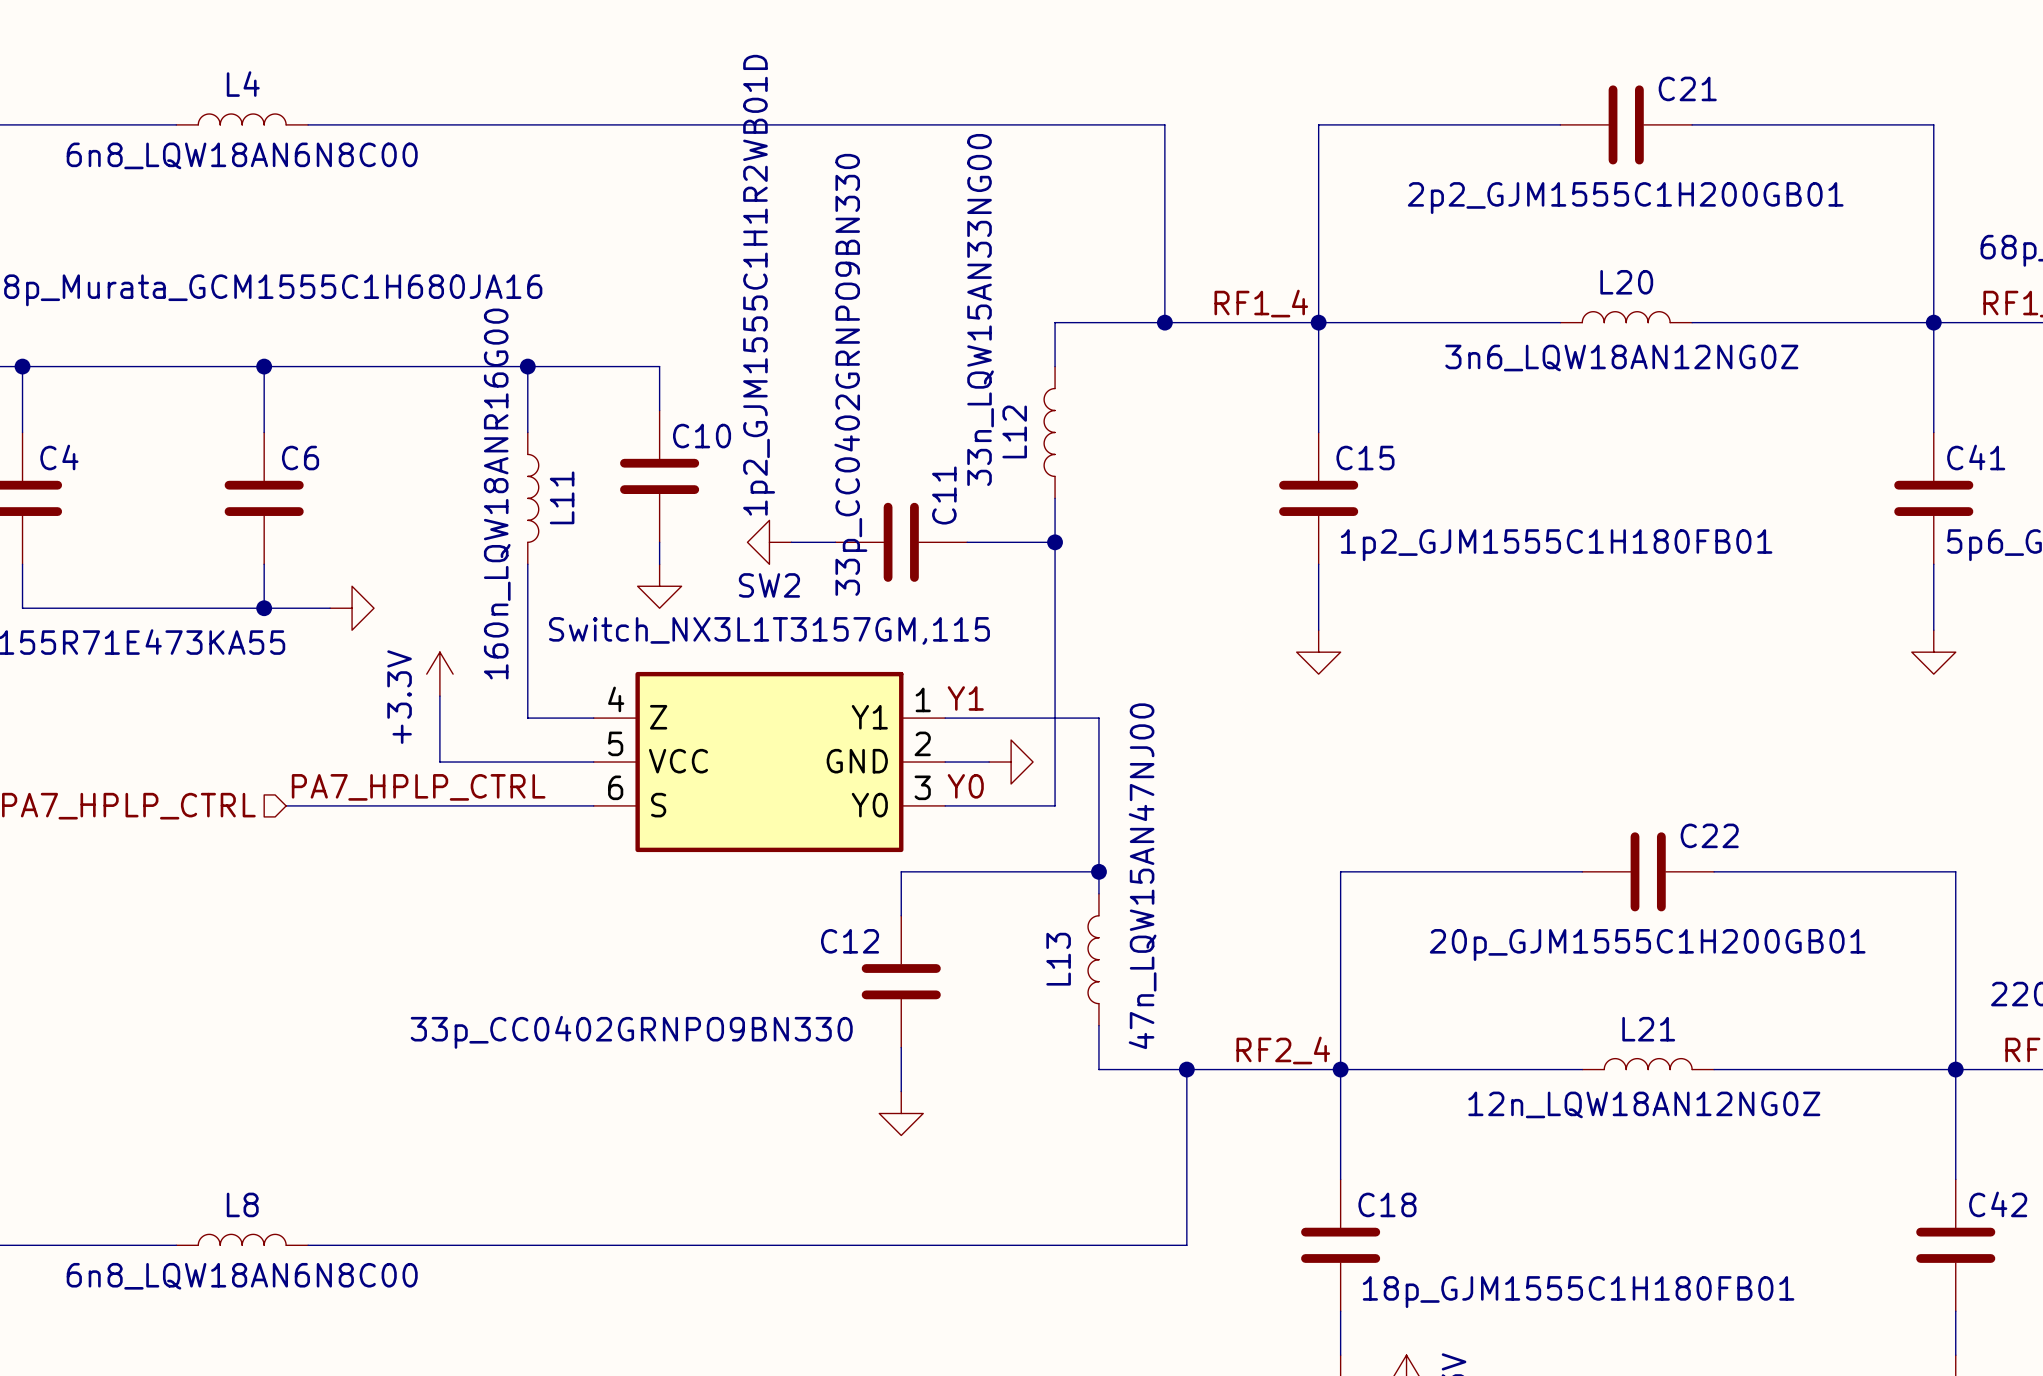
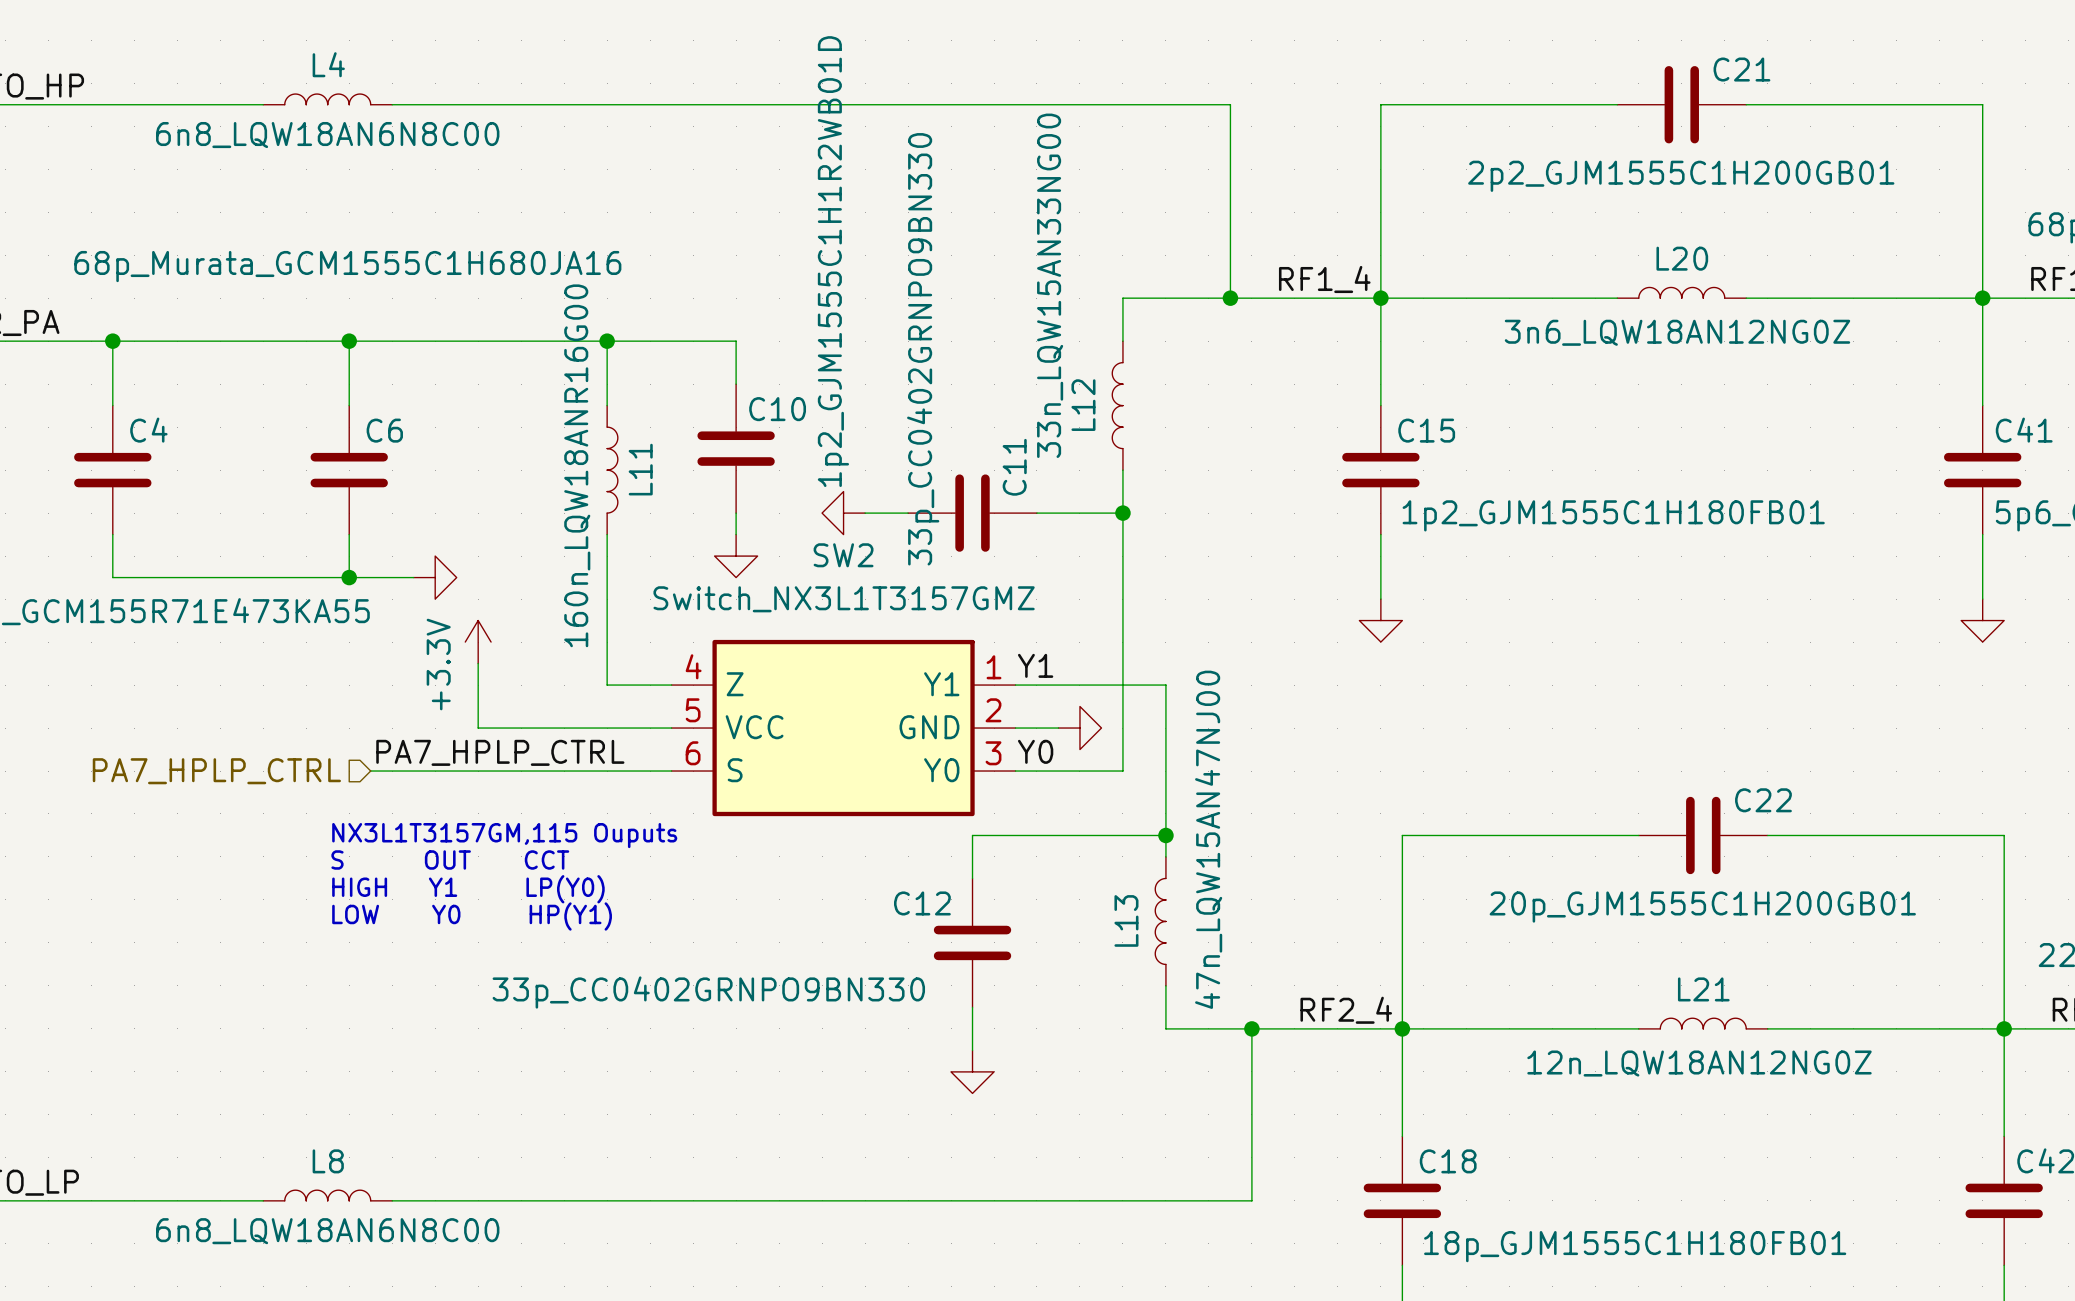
SW2 value: Switch_NX3L1T3157GM,115 (769, 630) -> Switch_NX3L1T3157GMZ (844, 599)
power symbol position: +3.3V (439, 674) -> +3.3V (478, 642)
wire: (439, 696) (439, 762) -> (478, 663) (478, 728) (521, 728)
text: none -> NX3L1T3157GM,115 Ouputs (504, 835)
text: none -> S OUT CCT (450, 859)
text: none -> HIGH Y1 LP(Y0) (468, 889)
text: none -> LOW Y0 HP(Y1) (472, 916)

